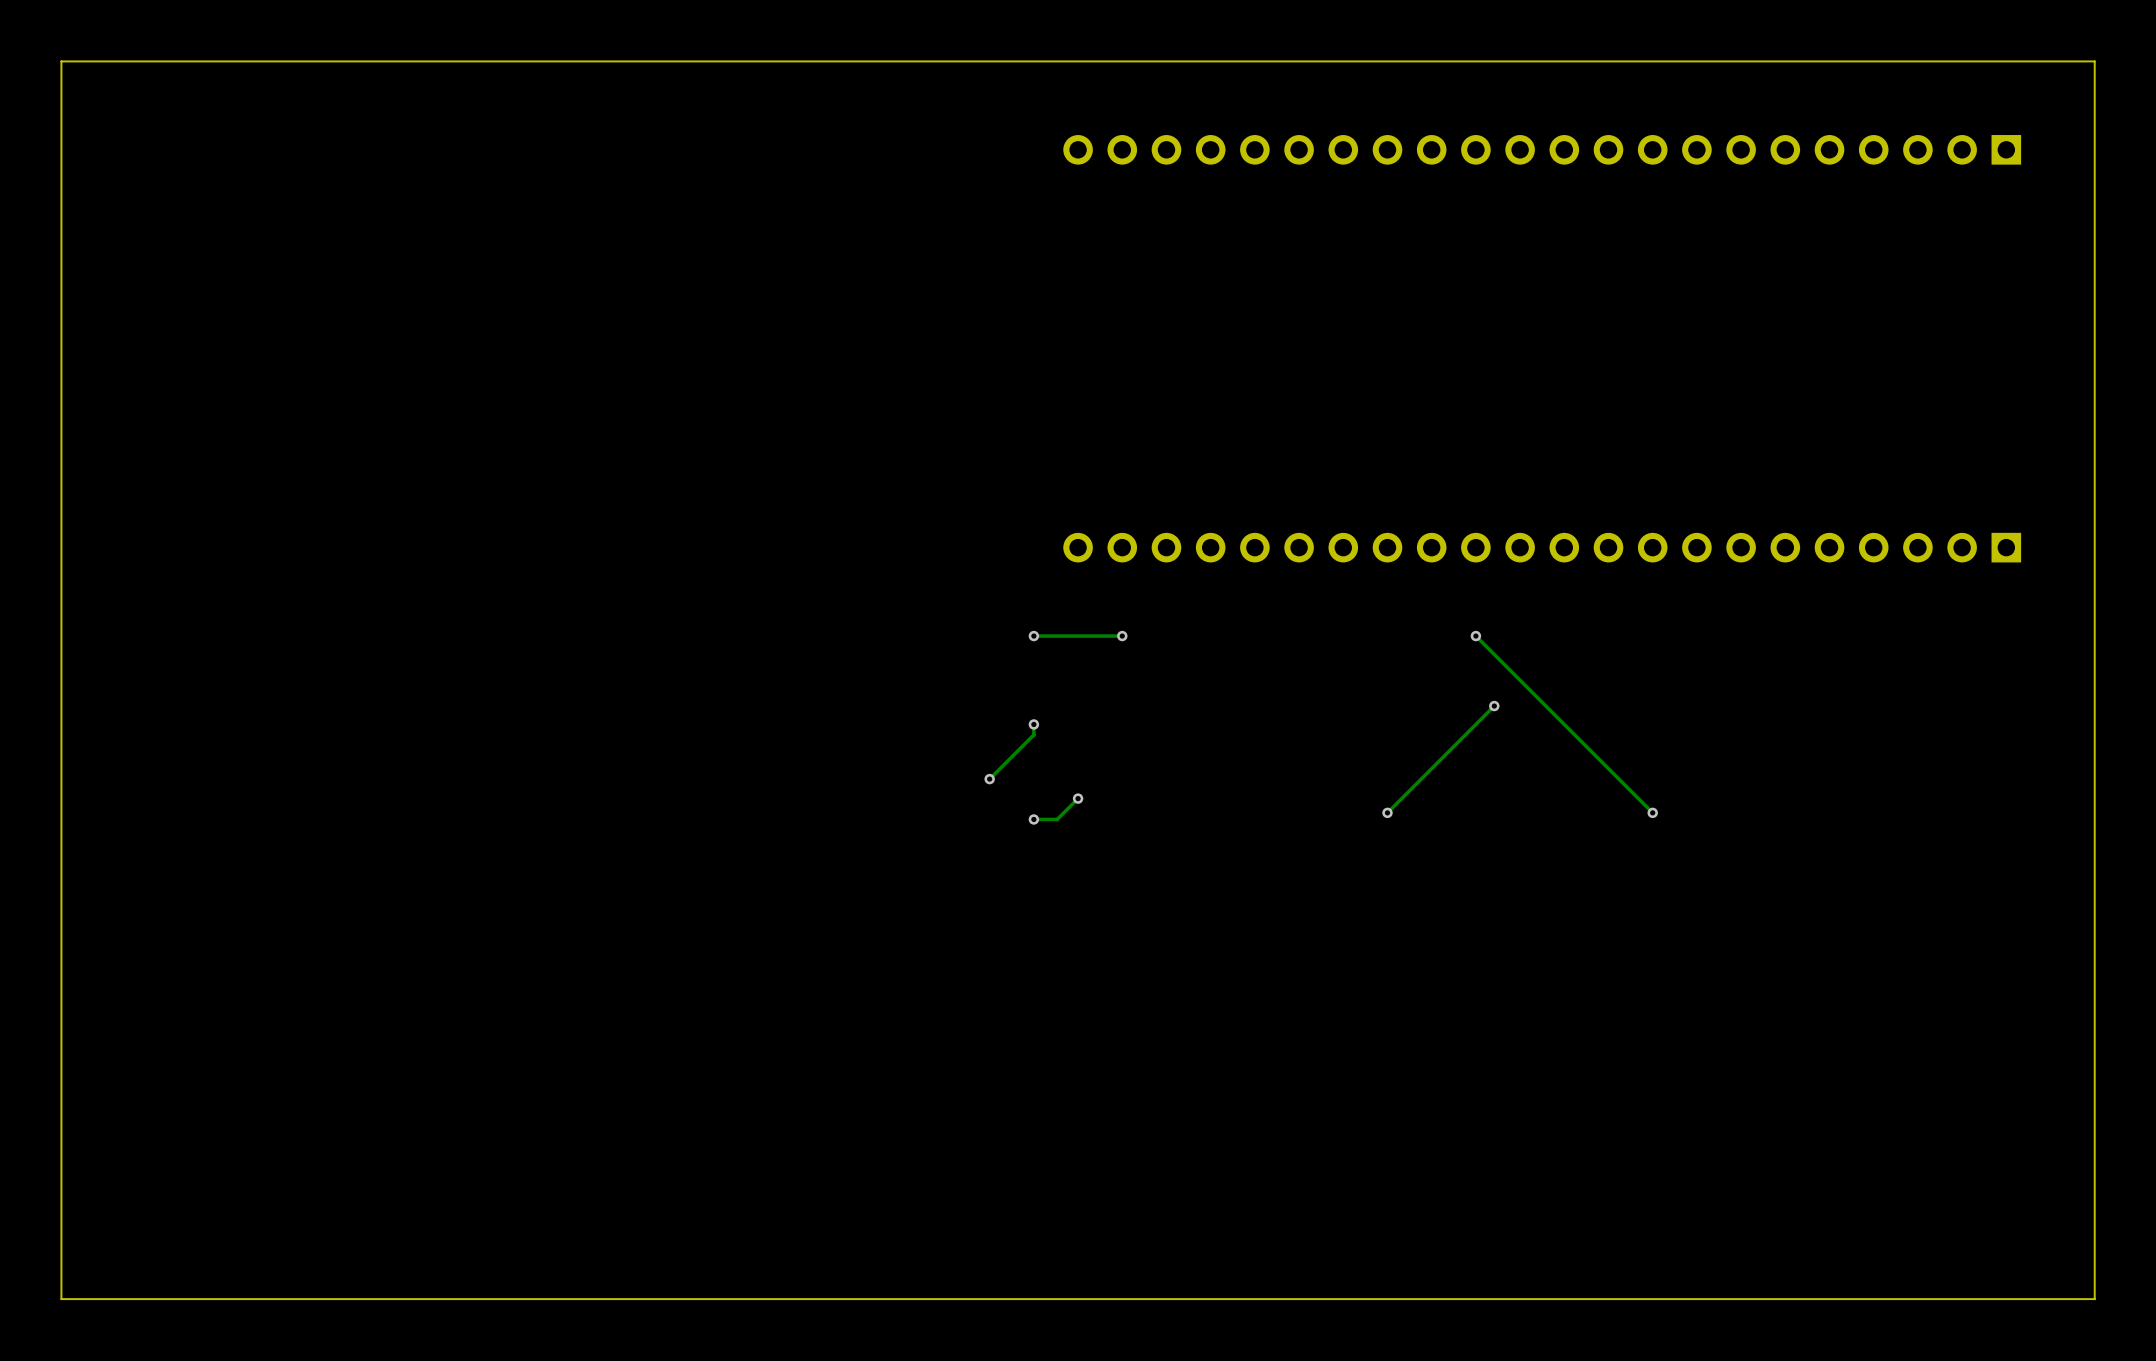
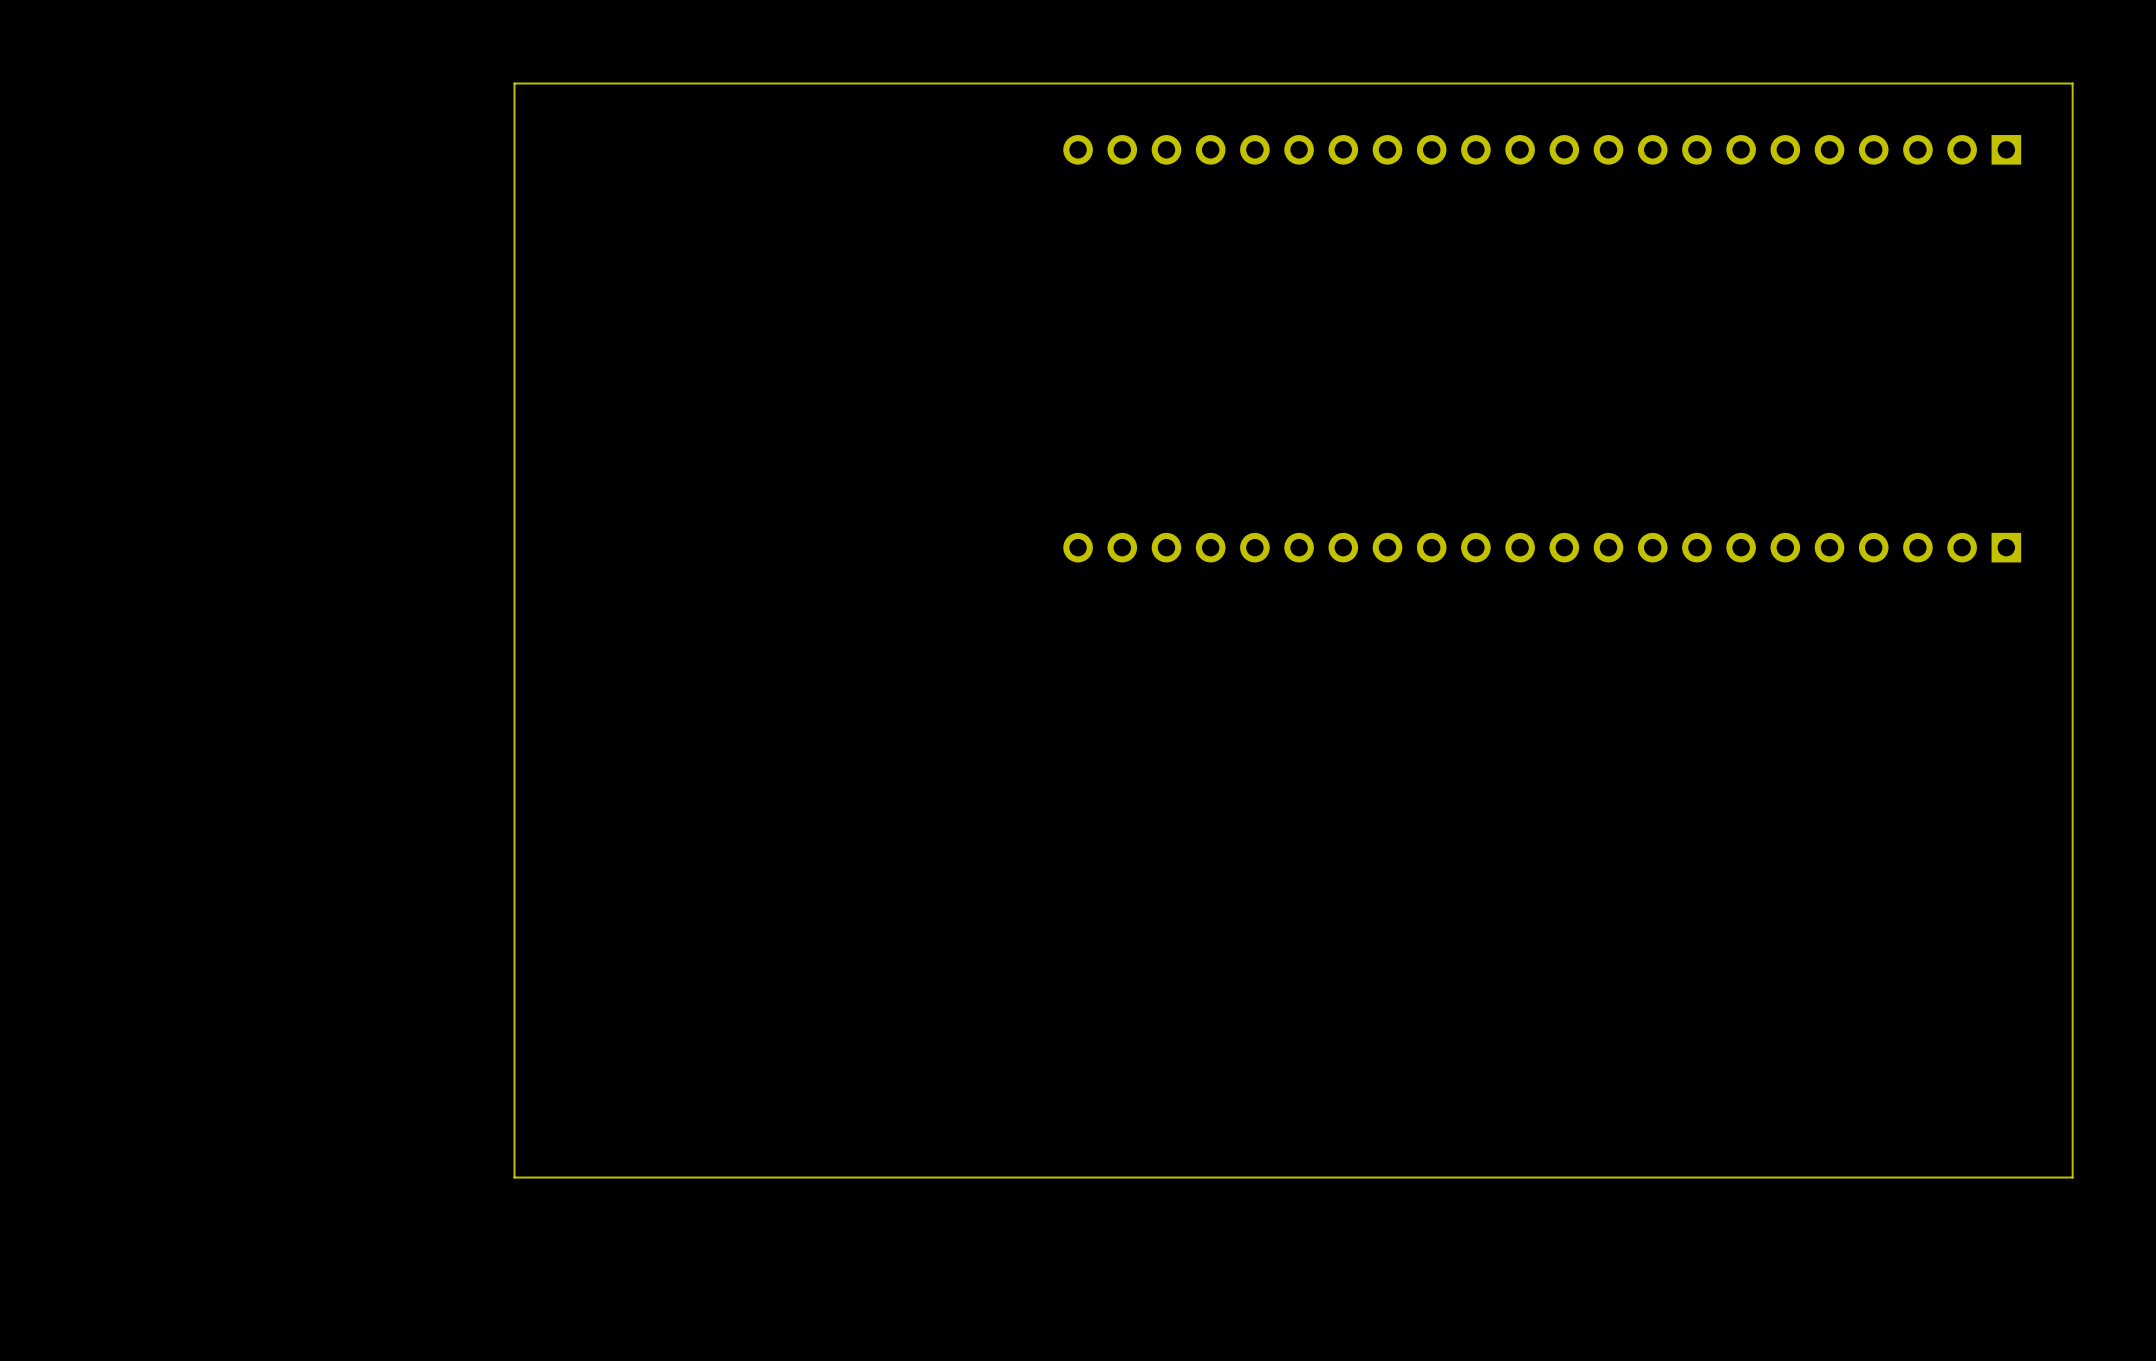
board edge: (2094, 61) (61, 61) (61, 1299) (2094, 1299) (2094, 61) -> (2072, 83) (2072, 1177) (514, 1177) (514, 83) (2072, 83)
via: (1033, 636) -> none
track: (1122, 636) (1033, 636) -> none
via: (1122, 636) -> none
track: (1475, 636) (1652, 812) -> none
via: (1475, 636) -> none
track: (1494, 706) (1387, 812) -> none
via: (1494, 706) -> none
track: (1033, 724) (1033, 734) (989, 779) -> none
via: (1033, 724) -> none
via: (989, 779) -> none
track: (1078, 798) (1057, 819) (1033, 819) -> none
via: (1078, 798) -> none
via: (1387, 812) -> none
via: (1652, 812) -> none
via: (1033, 819) -> none

